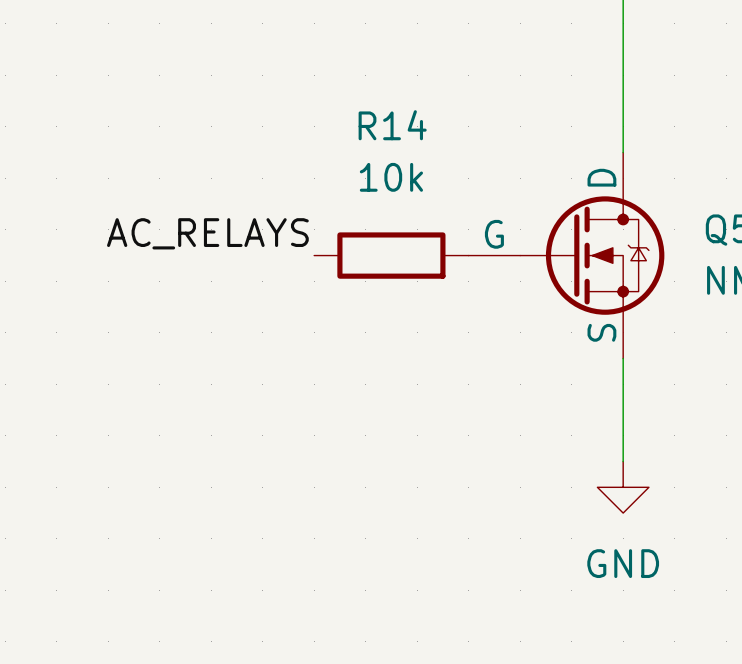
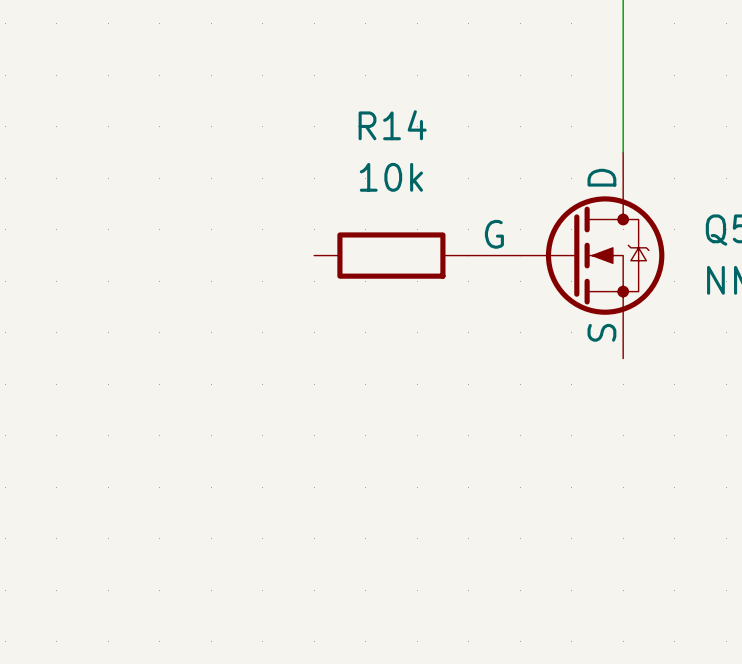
label: AC_RELAYS (207, 233) -> none
wire: (623, 358) (623, 461) -> none
power symbol: GND (623, 487) -> none

